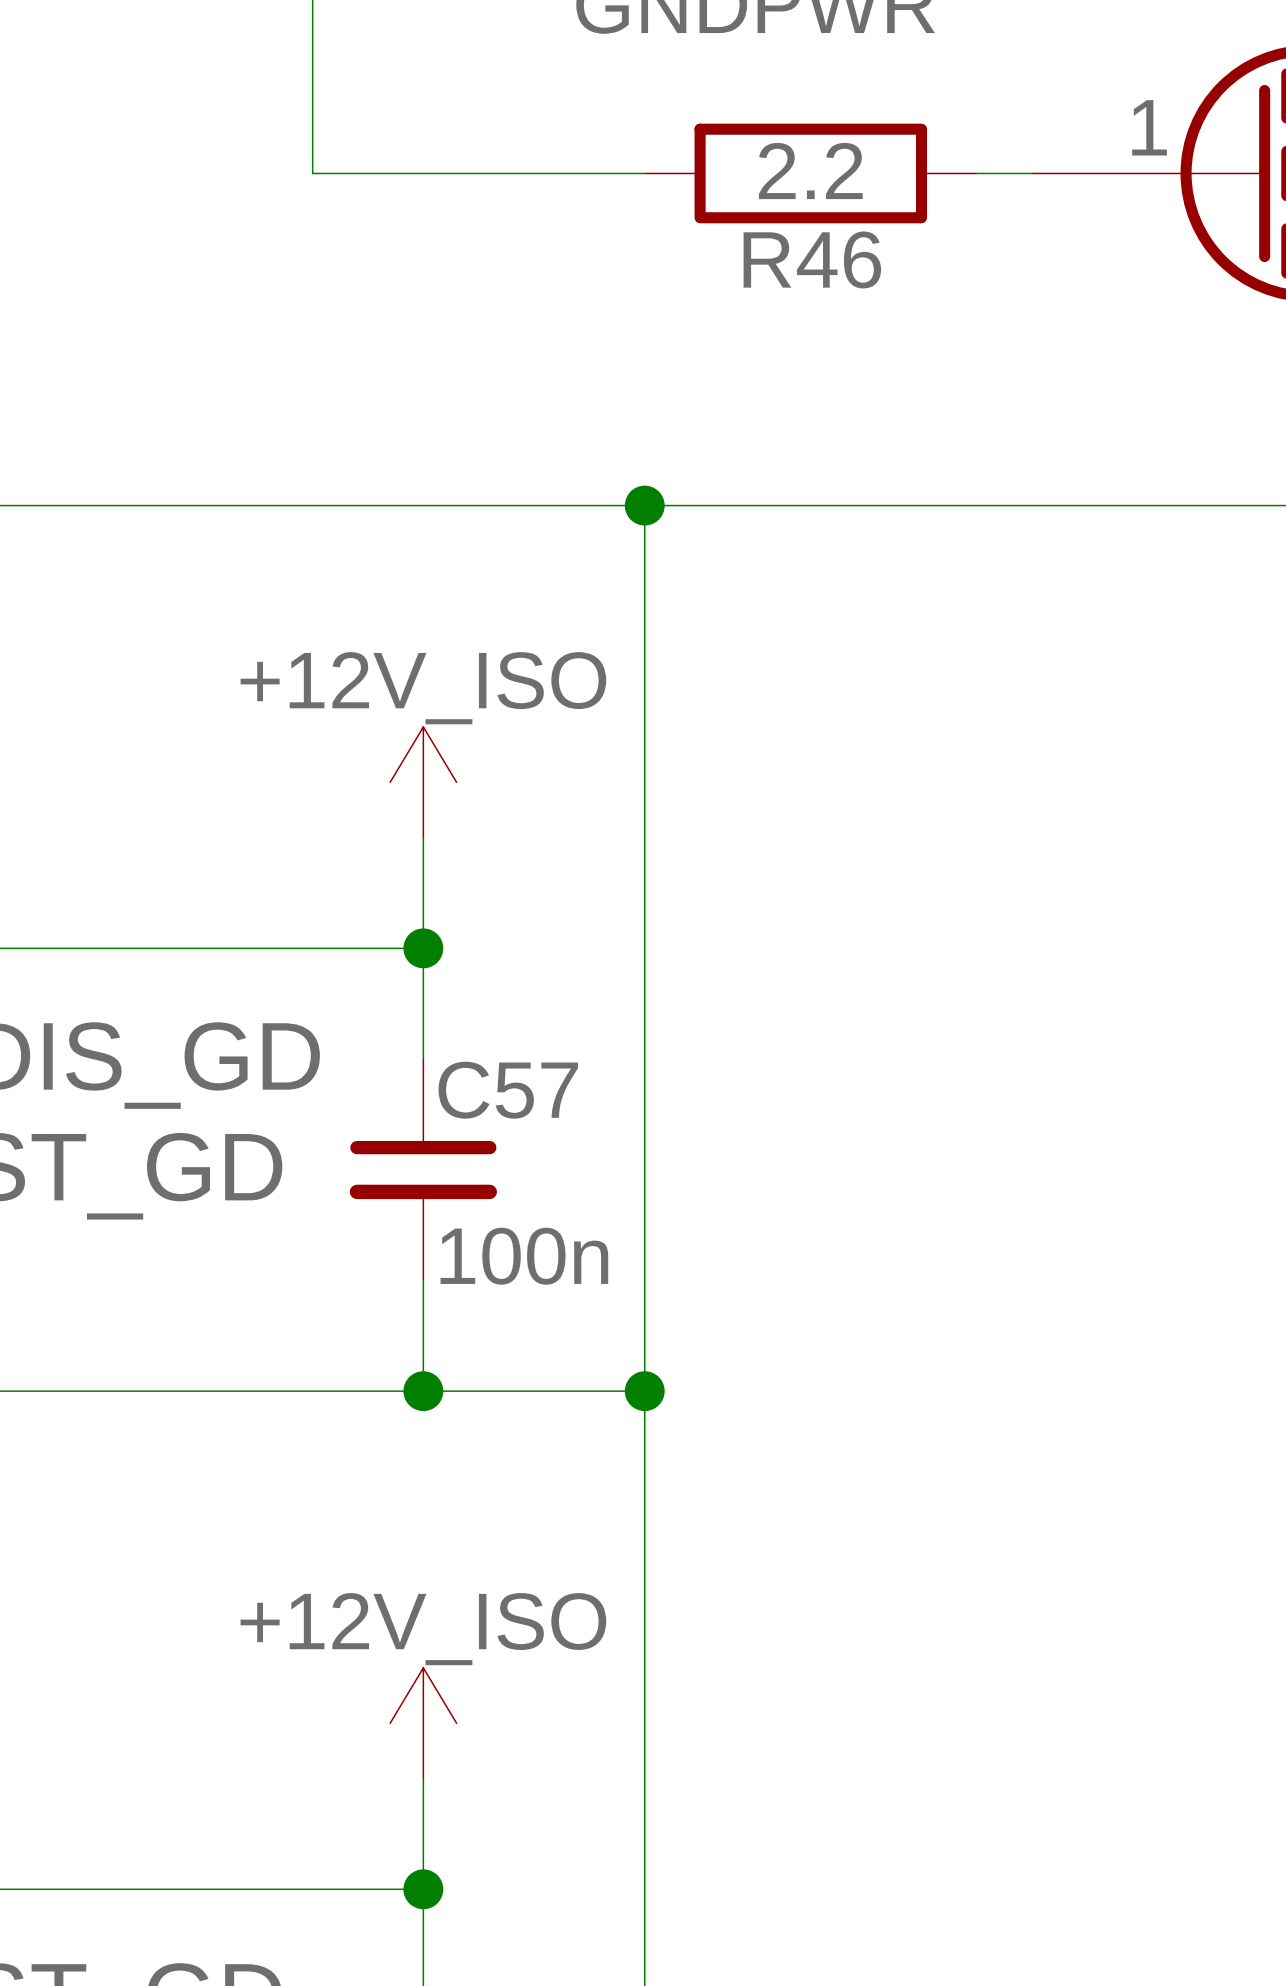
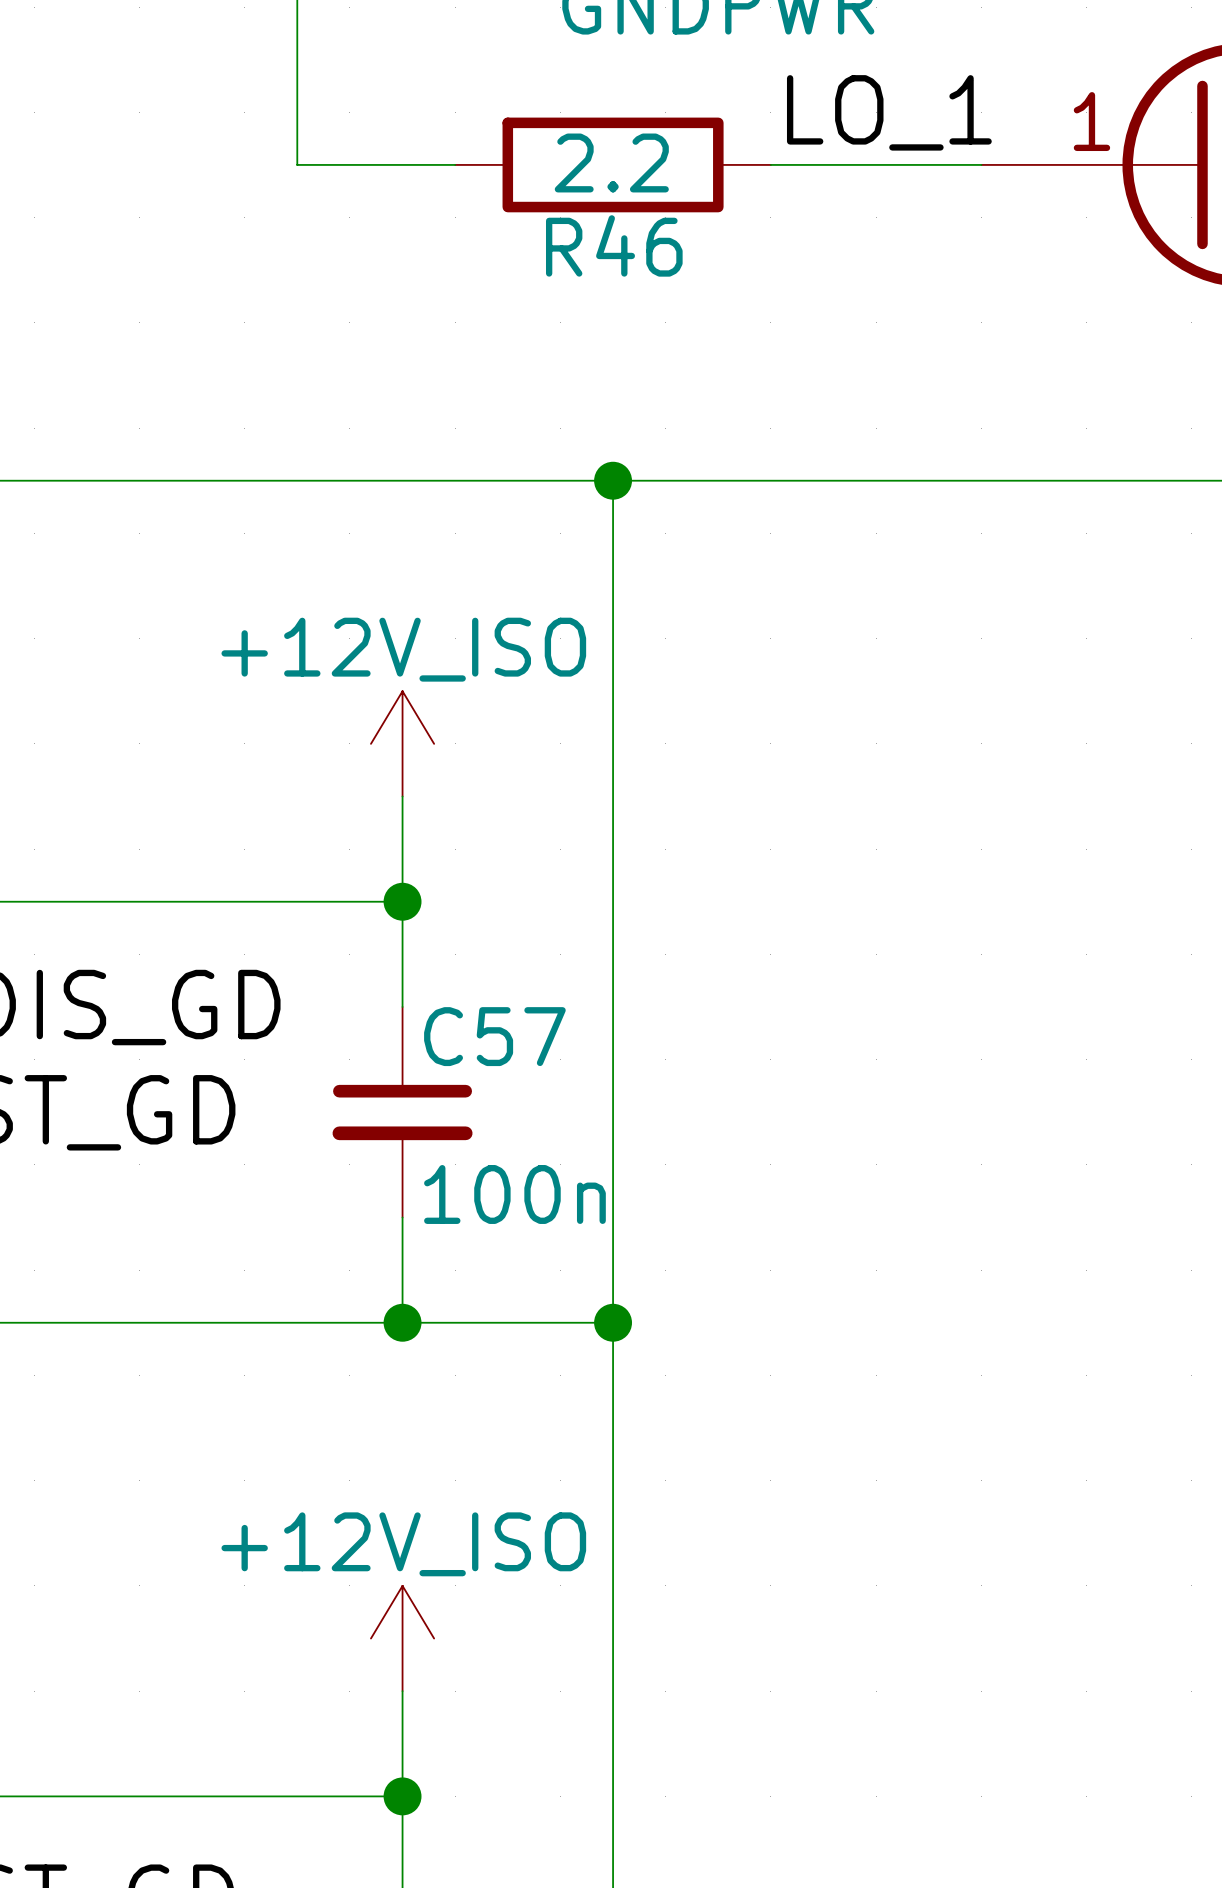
label: none -> LO_1 (889, 112)
wire: (478, 173) (644, 173) -> (770, 164) (928, 164)
R46 position: (810, 173) -> (613, 164)

